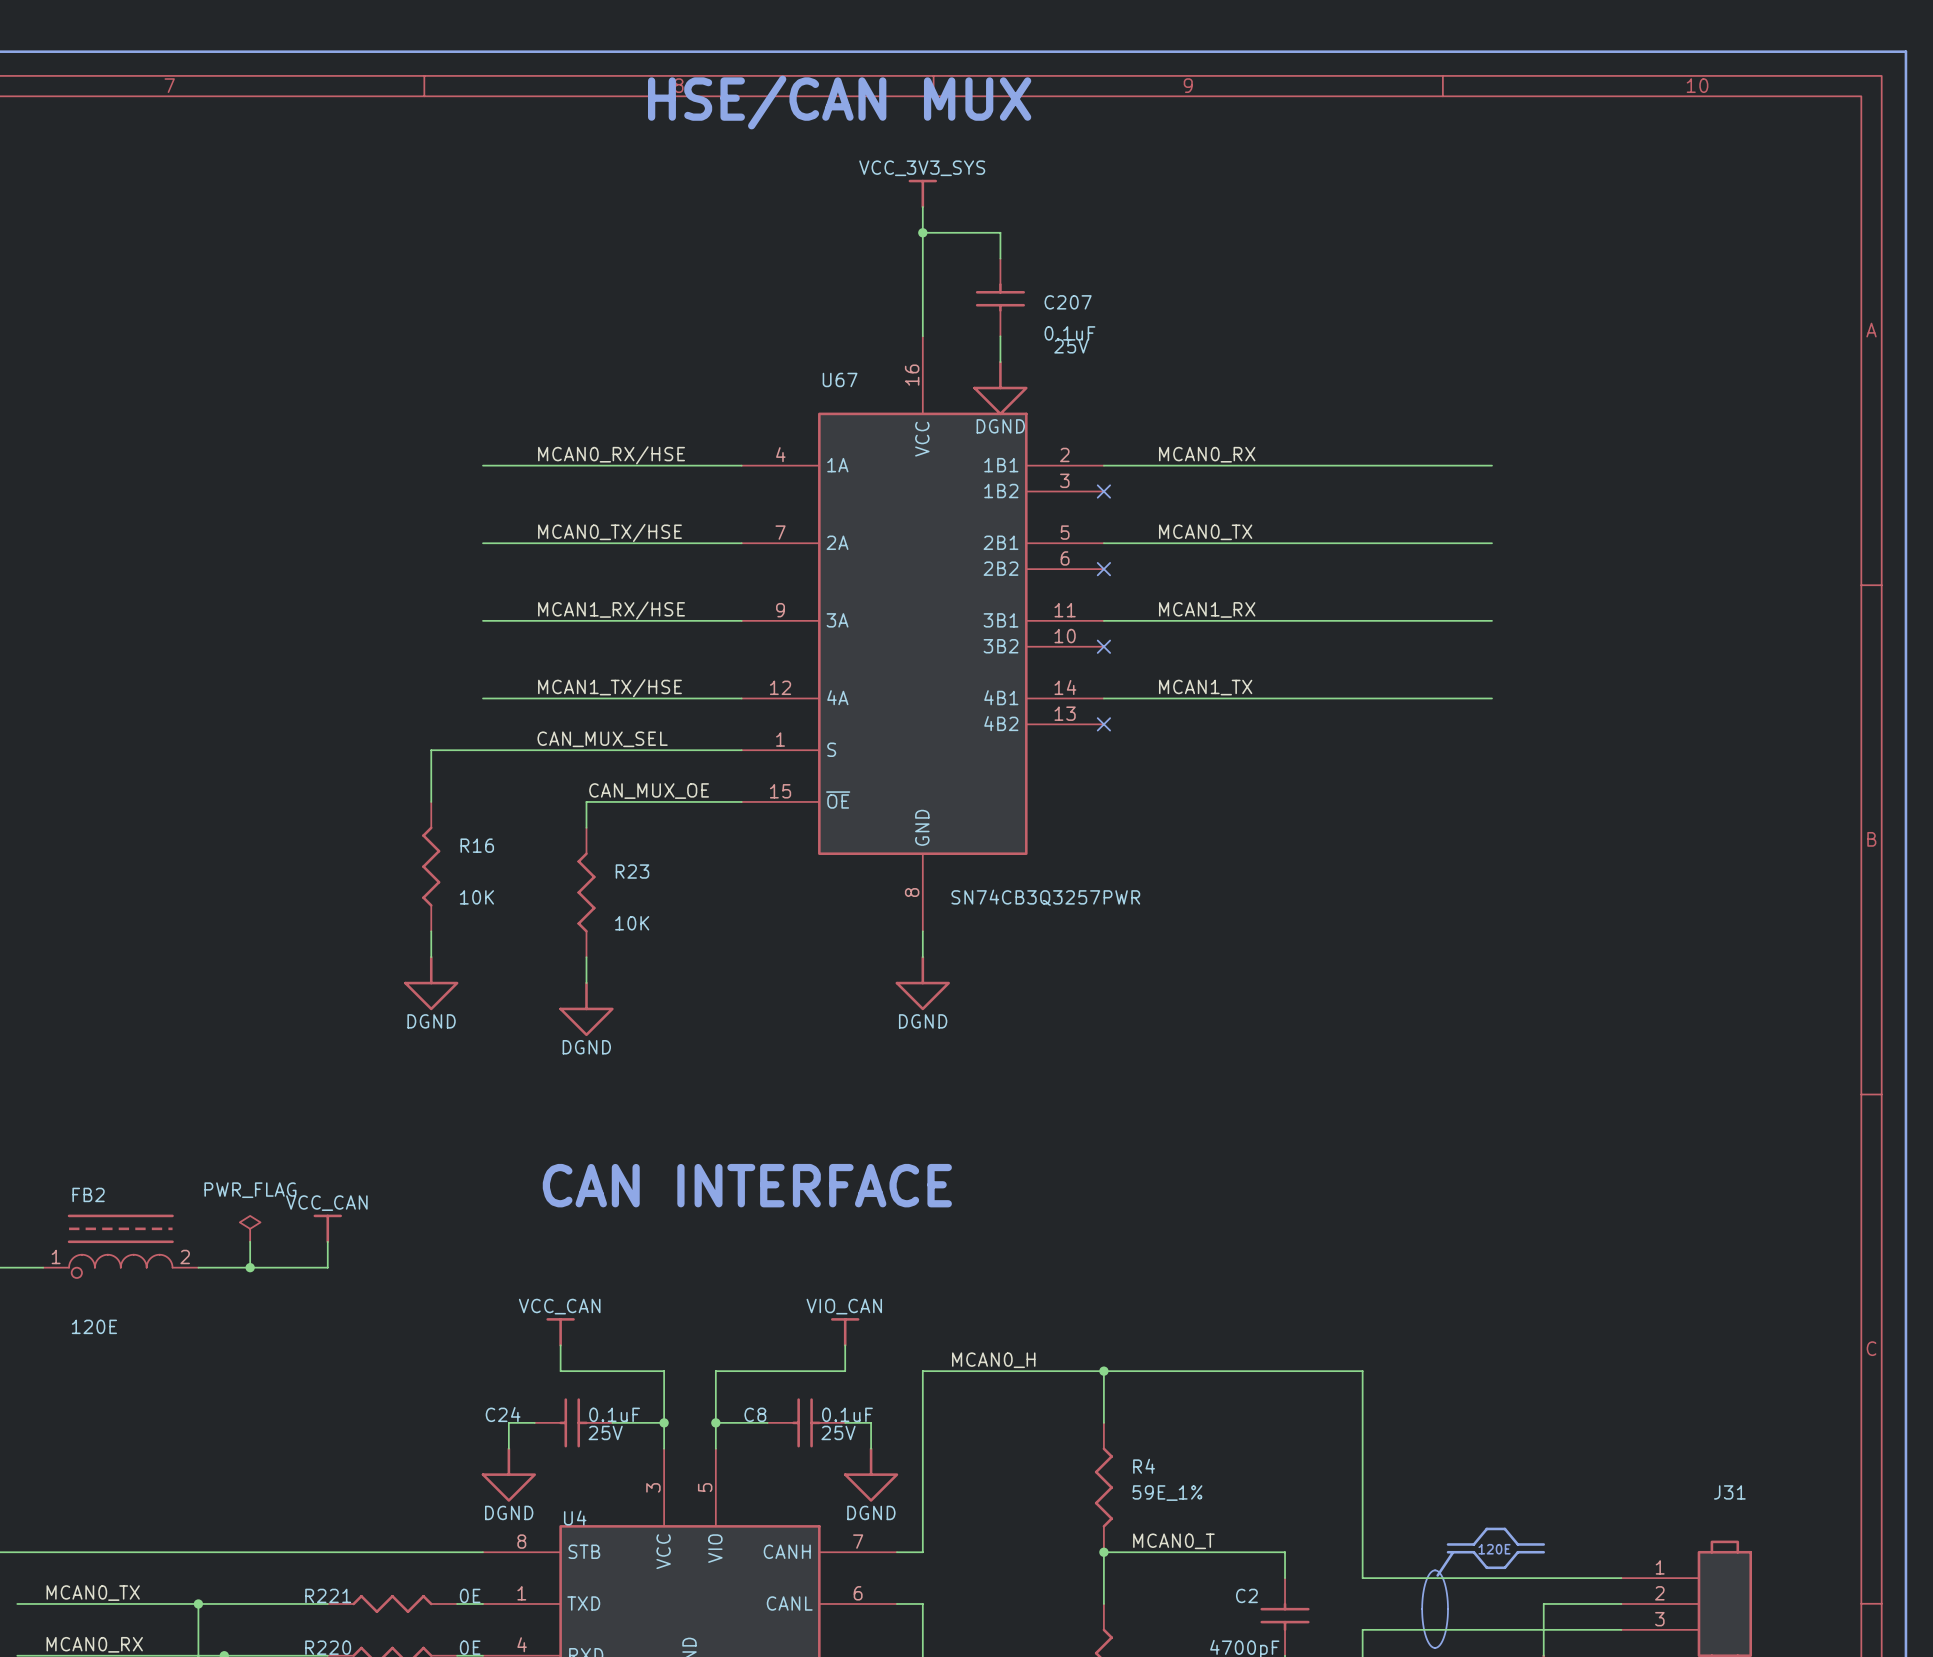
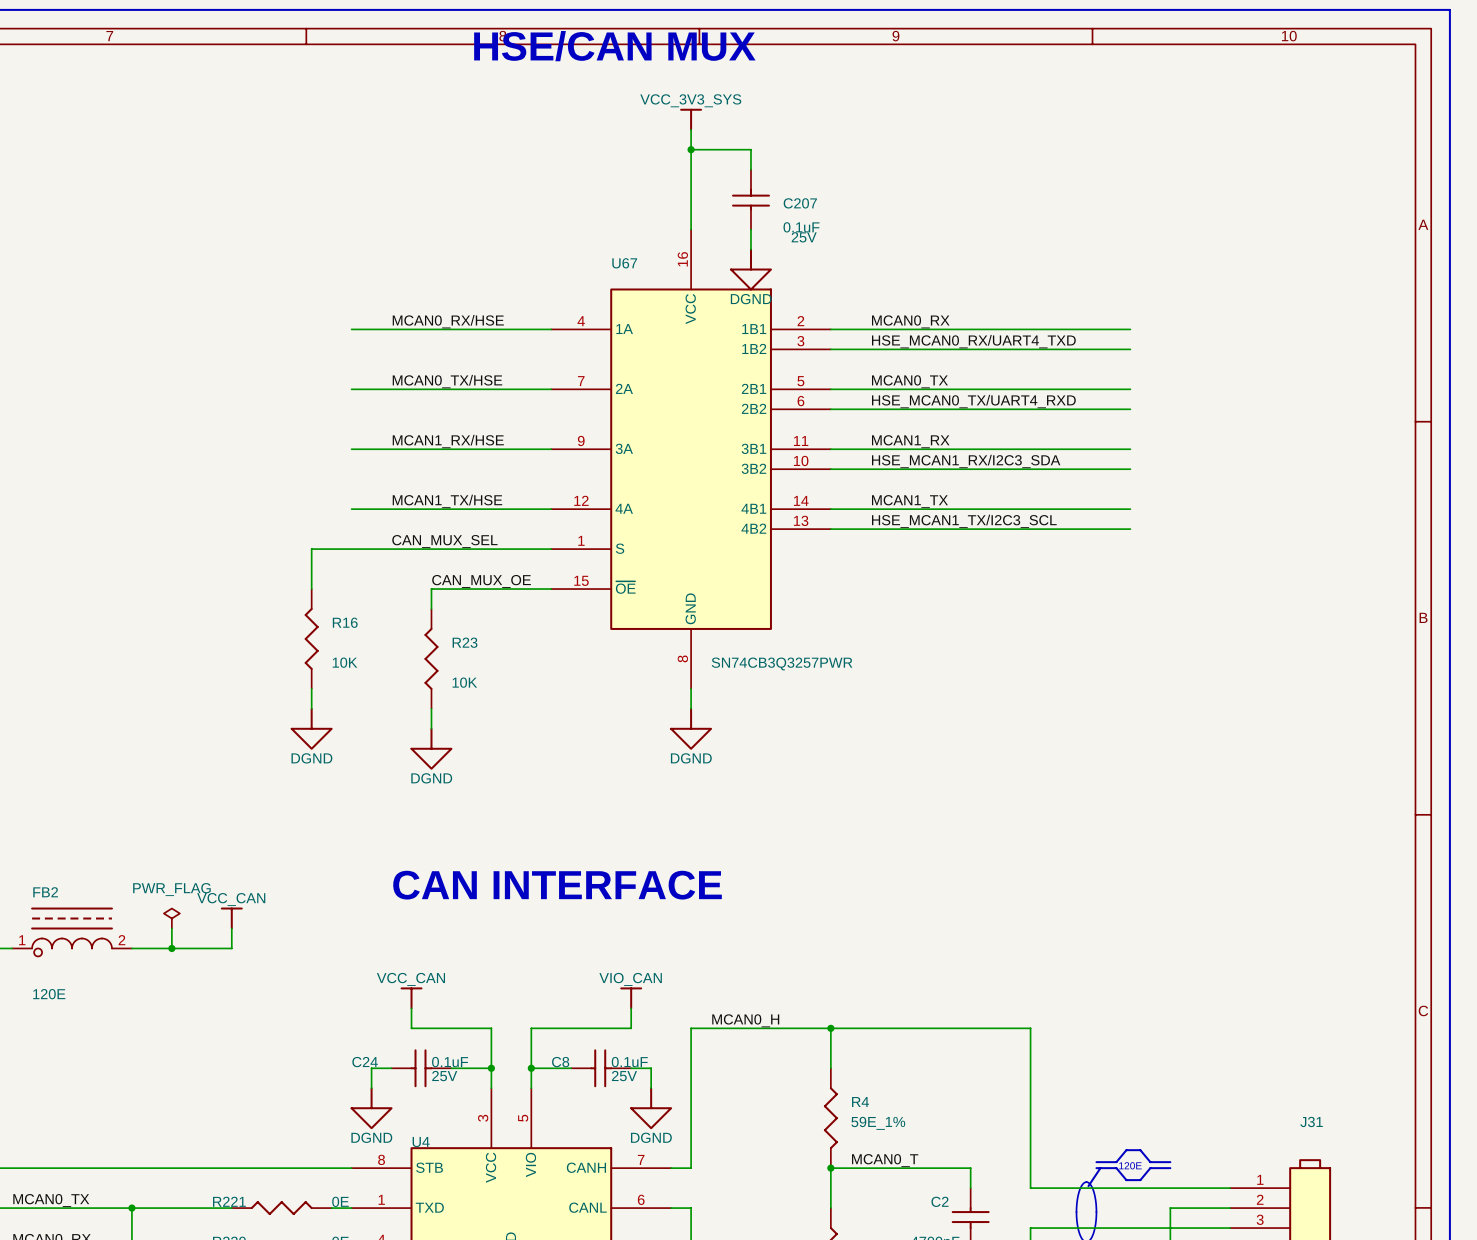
label: none -> HSE_MCAN0_RX/UART4_TXD (973, 341)
wire: none -> (830, 349) (1130, 349)
no-connect mark: (1103, 491) -> none
label: none -> HSE_MCAN0_TX/UART4_RXD (973, 401)
wire: none -> (830, 409) (1130, 409)
no-connect mark: (1103, 569) -> none
label: none -> HSE_MCAN1_RX/I2C3_SDA (966, 461)
wire: none -> (830, 469) (1130, 469)
no-connect mark: (1103, 646) -> none
label: none -> HSE_MCAN1_TX/I2C3_SCL (964, 521)
wire: none -> (830, 529) (1130, 529)
no-connect mark: (1103, 724) -> none

